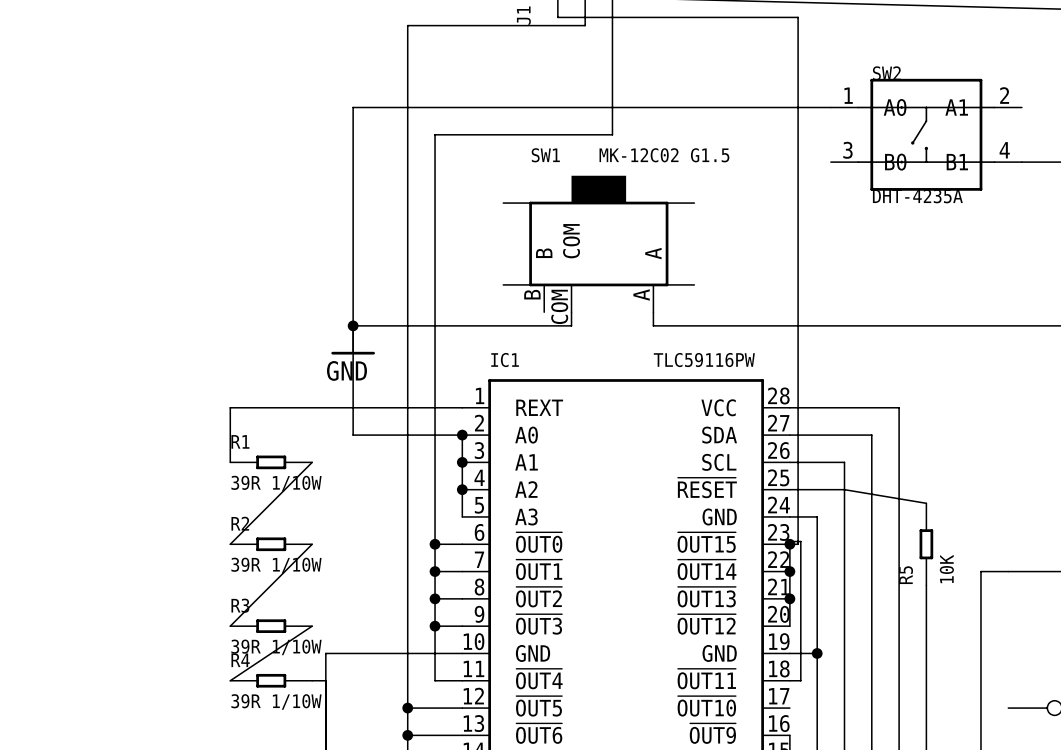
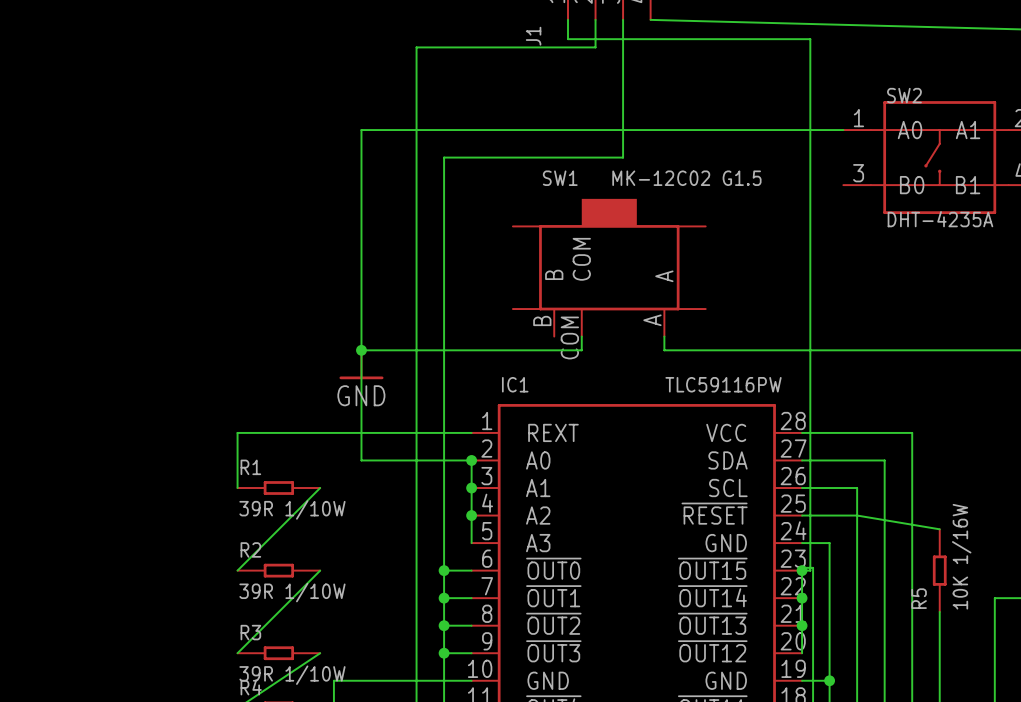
R5 value: 10K (946, 569) -> 10K 1/16W (961, 556)

